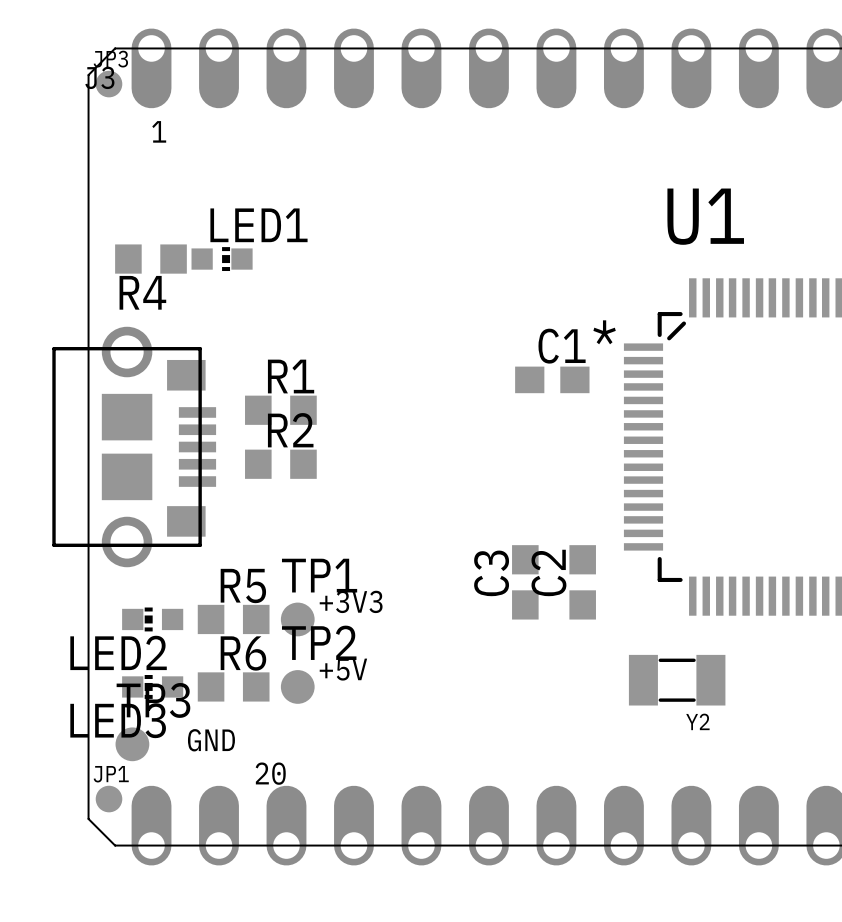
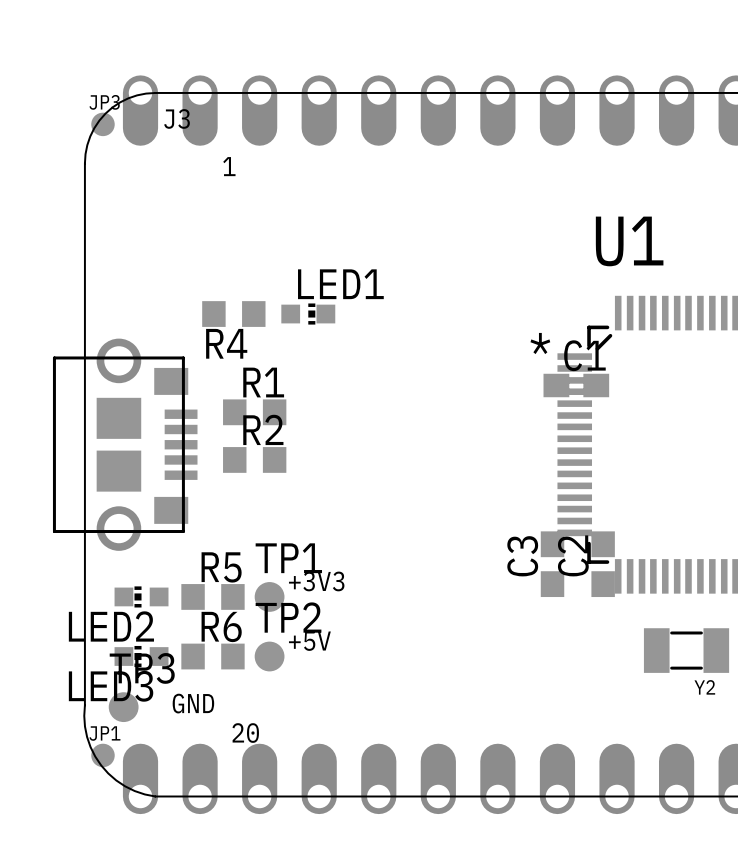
board edge: (168, 48) (115, 48) (88, 75) (88, 128) -> (155, 92) (128, 98) (105, 113) (90, 136) (84, 163)
text position: J3 (99, 77) -> J3 (177, 118)
text position: 1 (159, 131) -> 1 (229, 166)
R4 position: (150, 259) -> (233, 314)
LED1 position: (222, 259) -> (308, 314)
C1 position: (552, 379) -> (576, 385)
C3 position: (525, 582) -> (552, 564)
C2 position: (582, 582) -> (603, 564)
Y2 position: (677, 680) -> (686, 650)
board edge: (88, 742) (88, 818) (115, 845) (168, 845) -> (84, 705) (87, 736) (101, 765) (125, 786) (155, 796)

